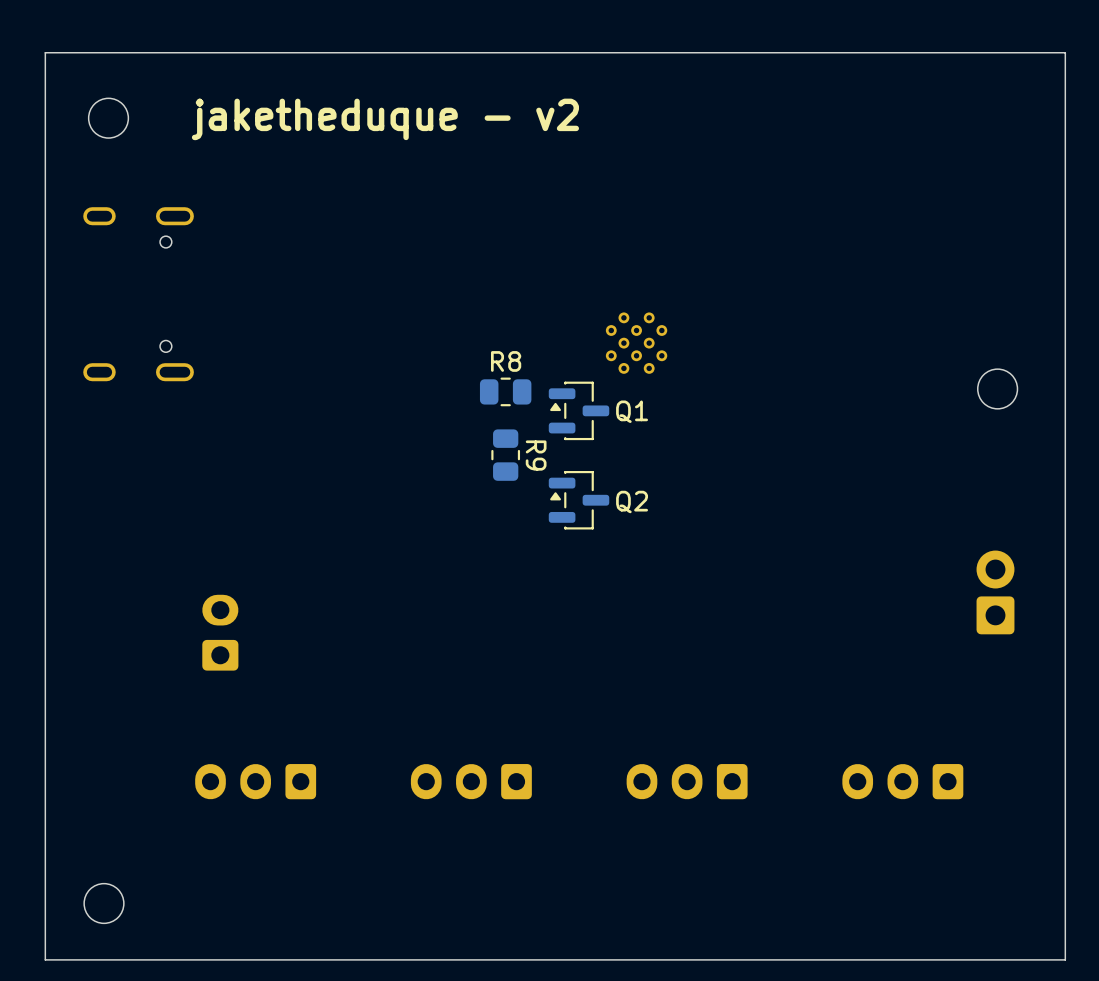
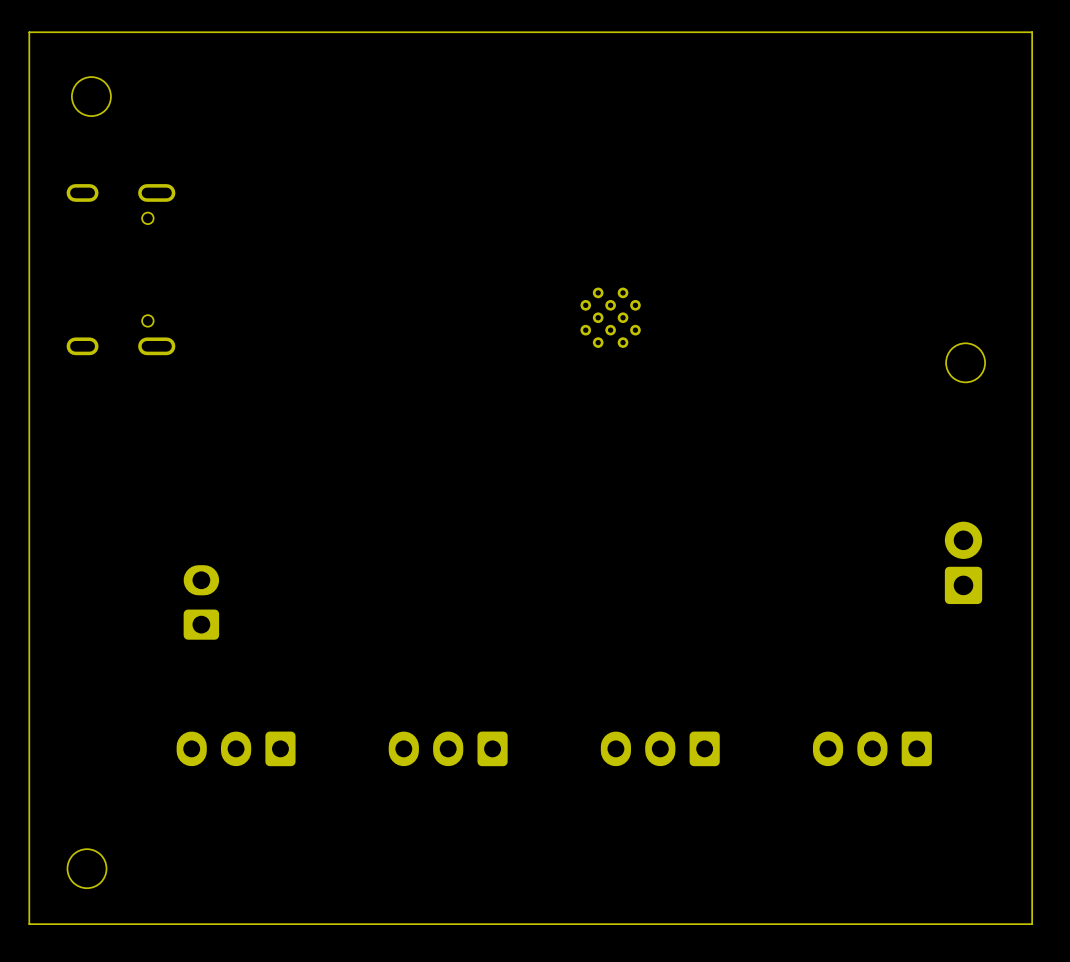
text: jaketheduque - v2 (385, 119) -> none
R8: (505, 391) -> none
Q1: (579, 410) -> none
R9: (505, 455) -> none
Q2: (579, 500) -> none

